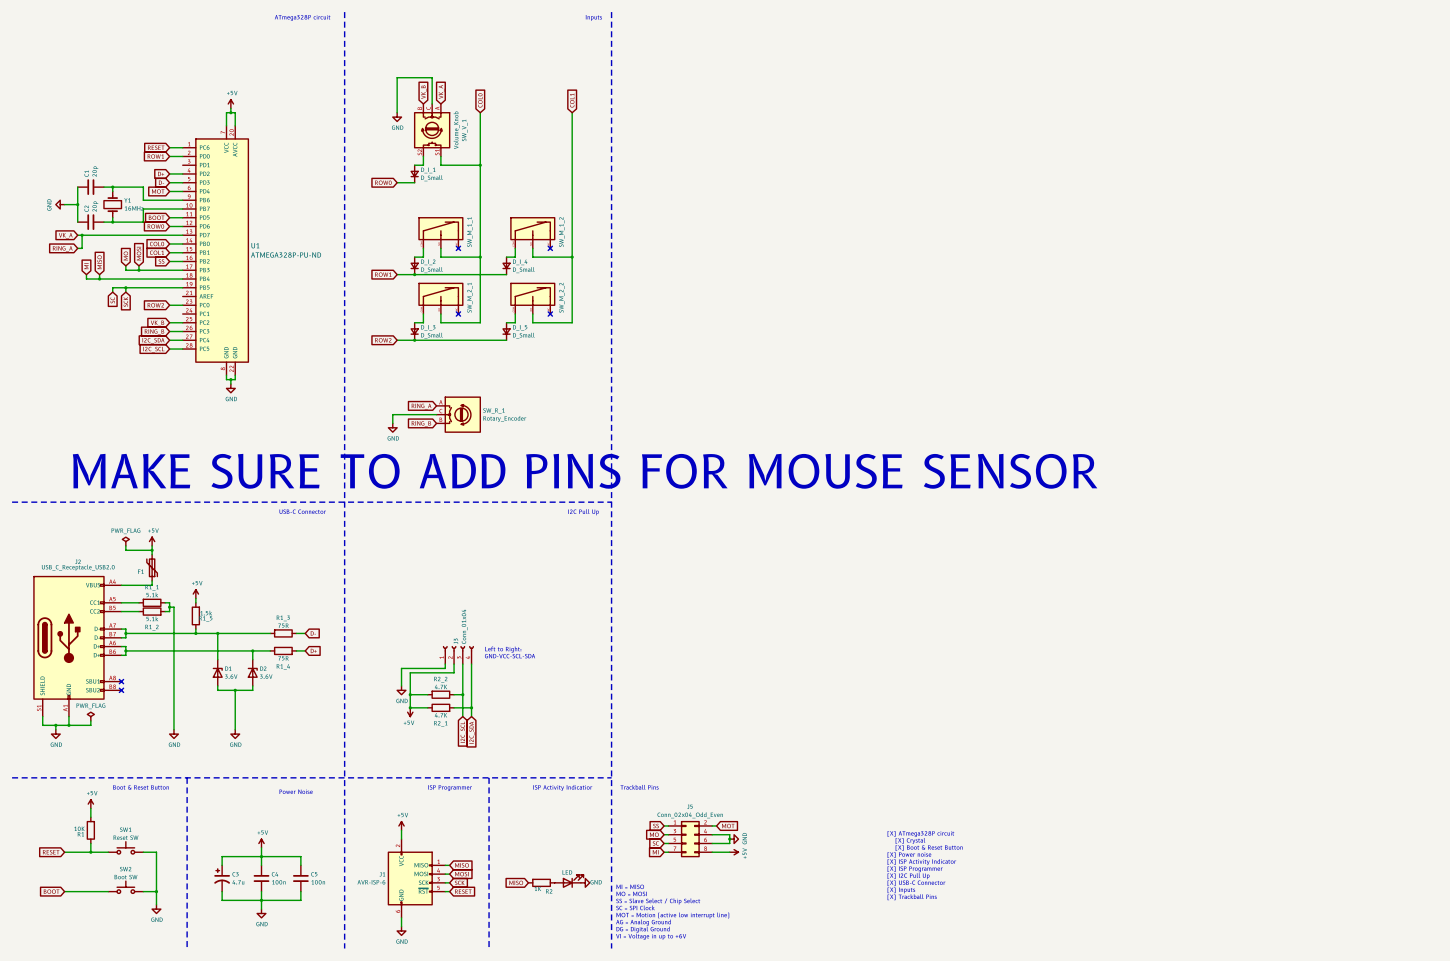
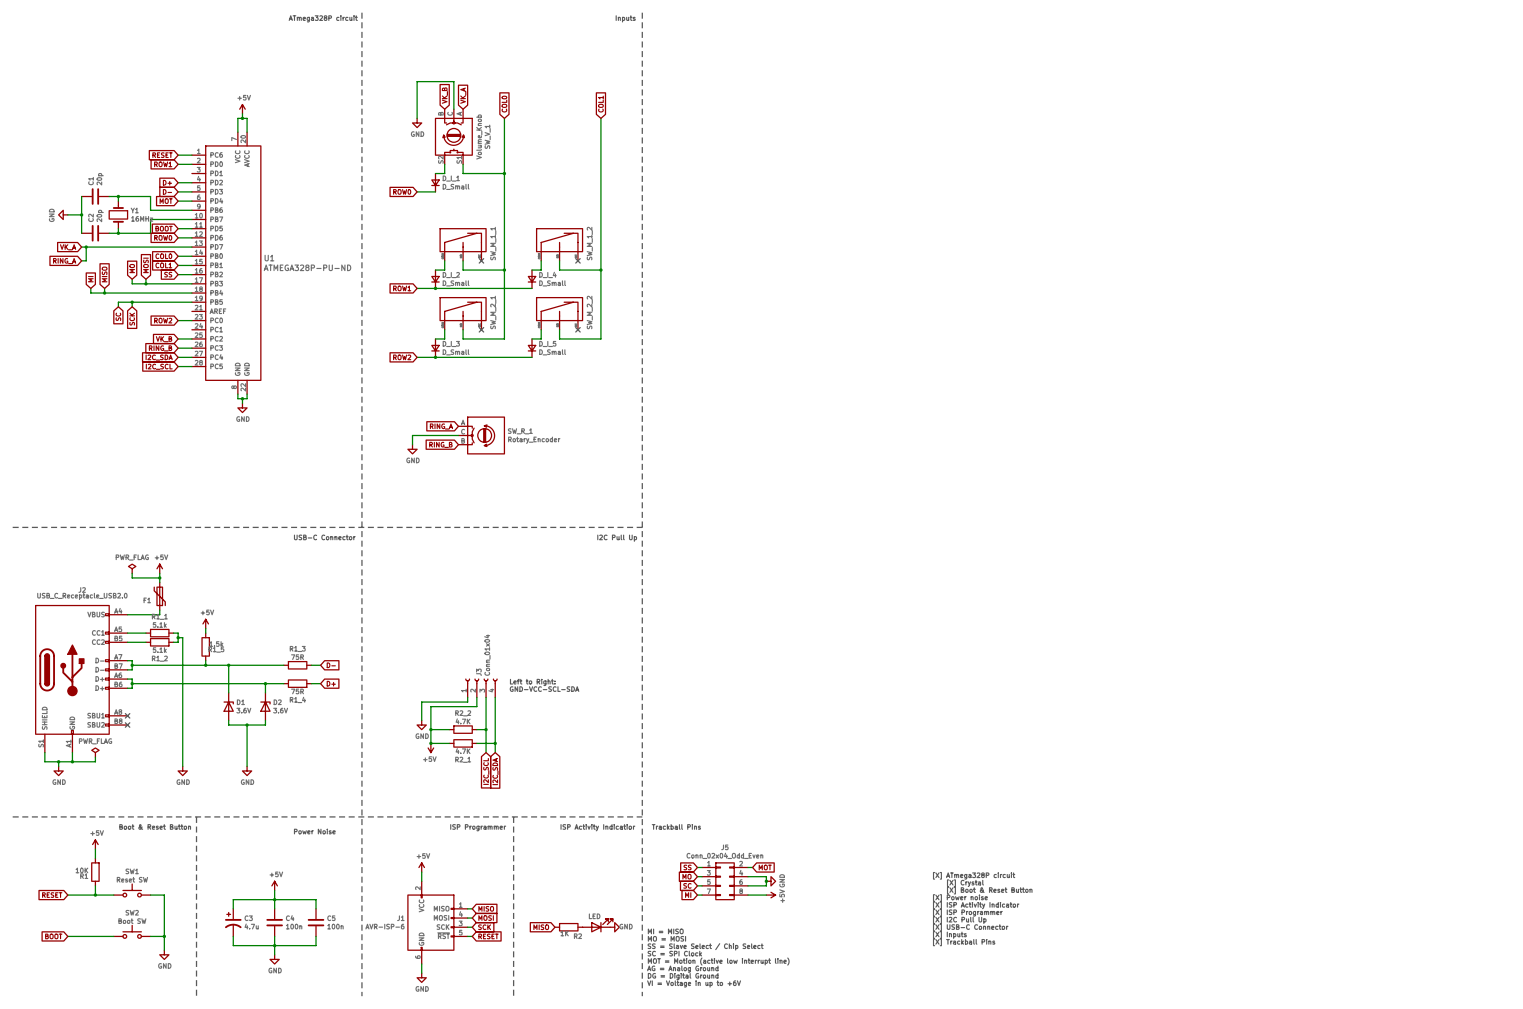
text: MAKE SURE TO ADD PINS FOR MOUSE SENSOR (585, 471) -> none

